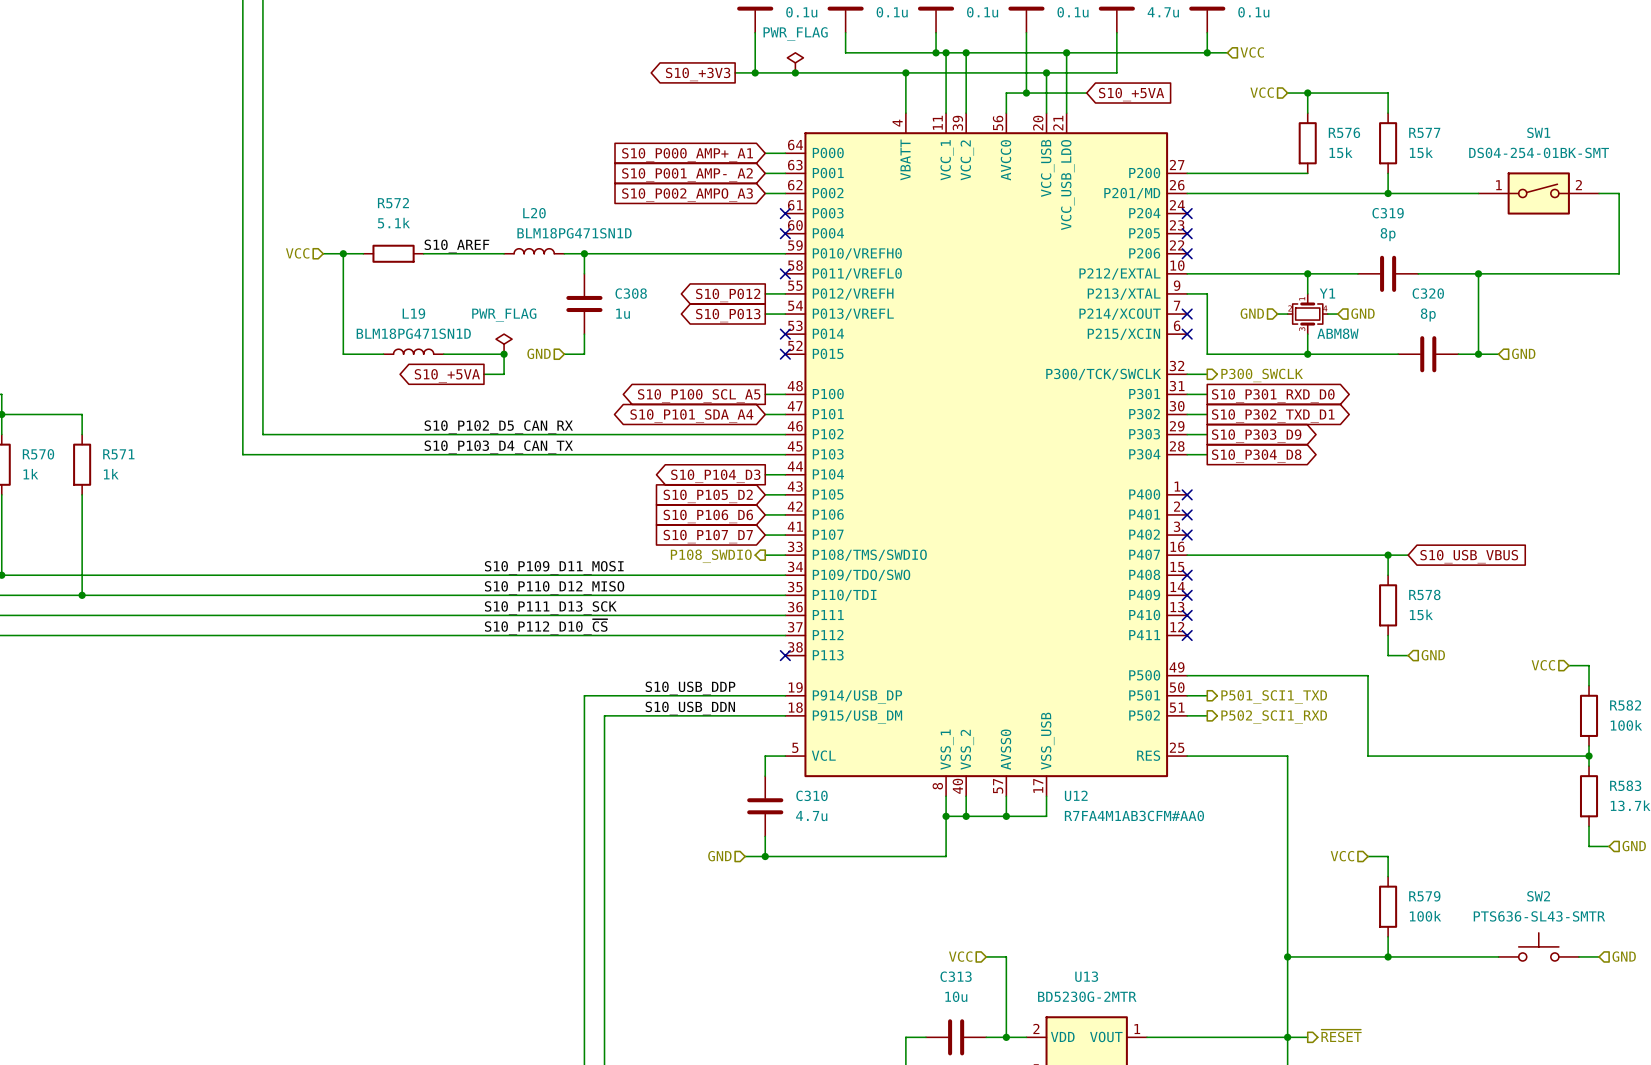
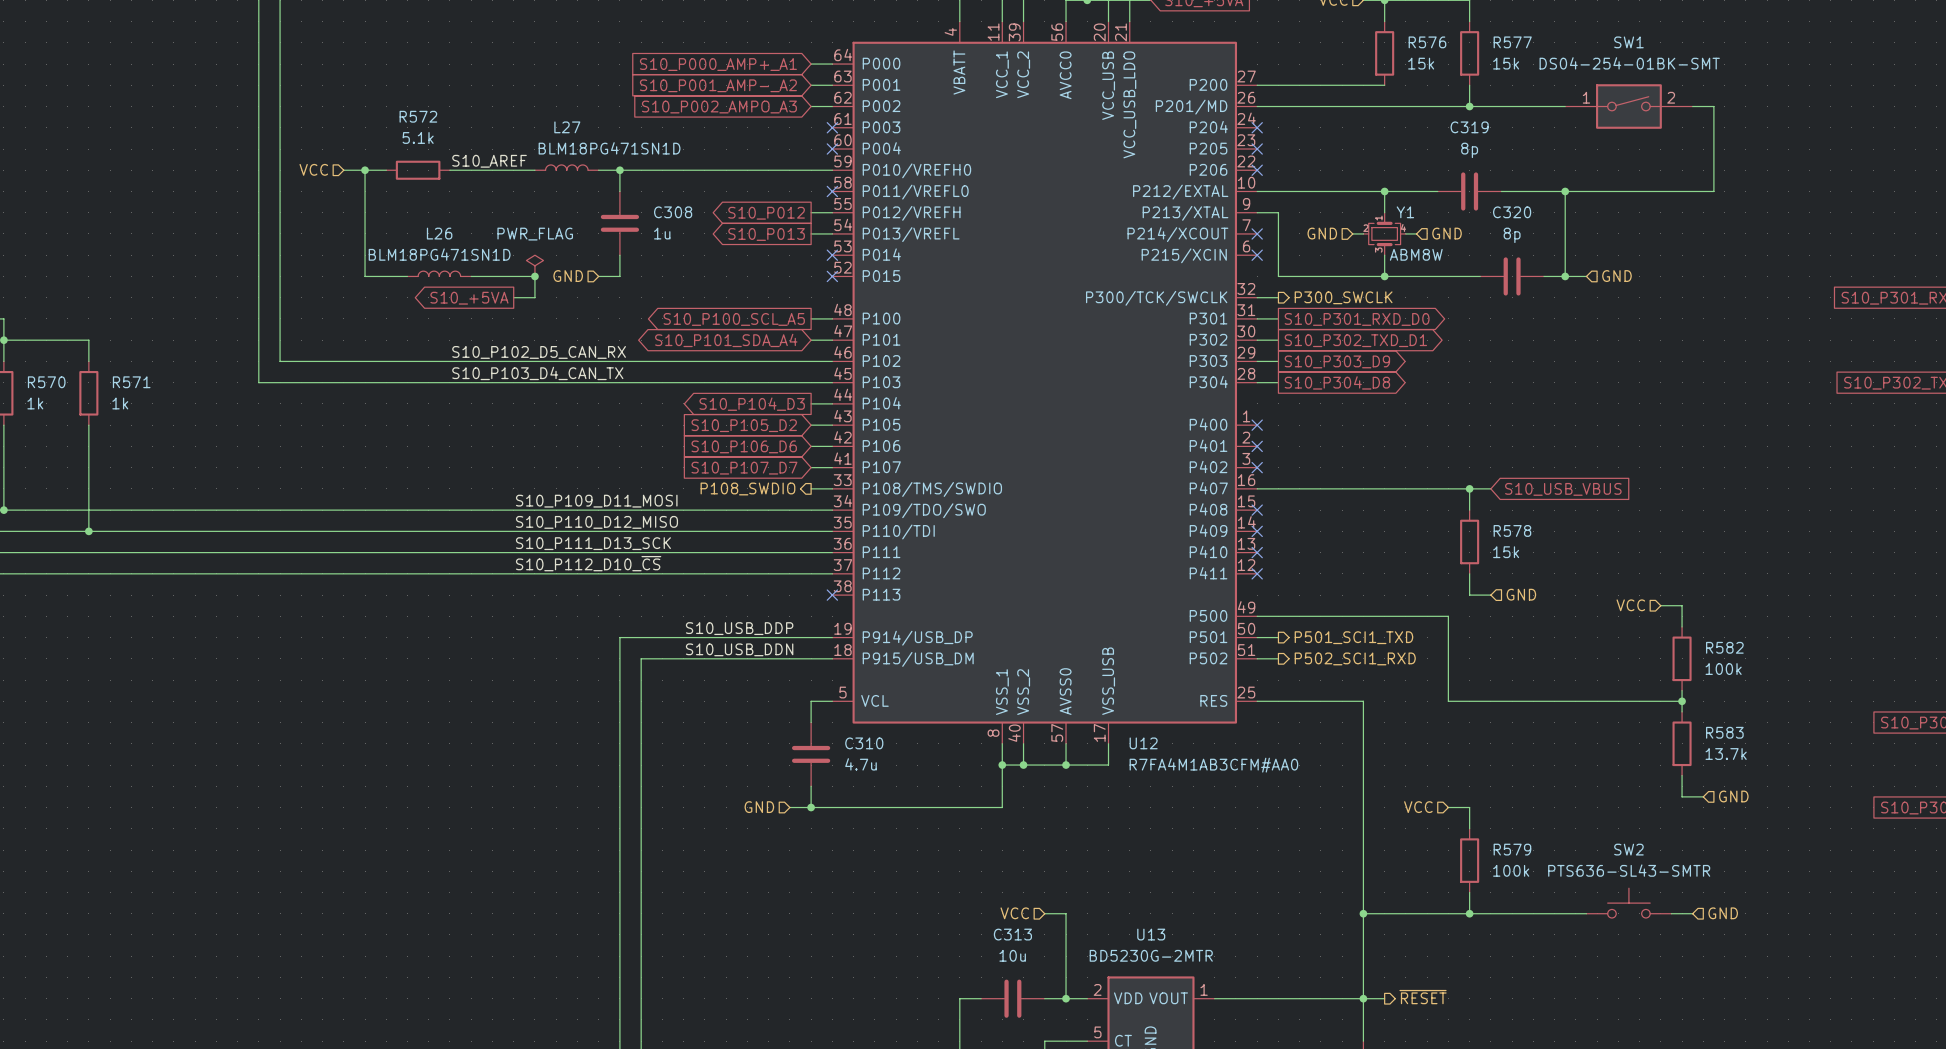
L20 name: L20 (534, 213) -> L27 (567, 127)
L19 name: L19 (413, 313) -> L26 (439, 233)

